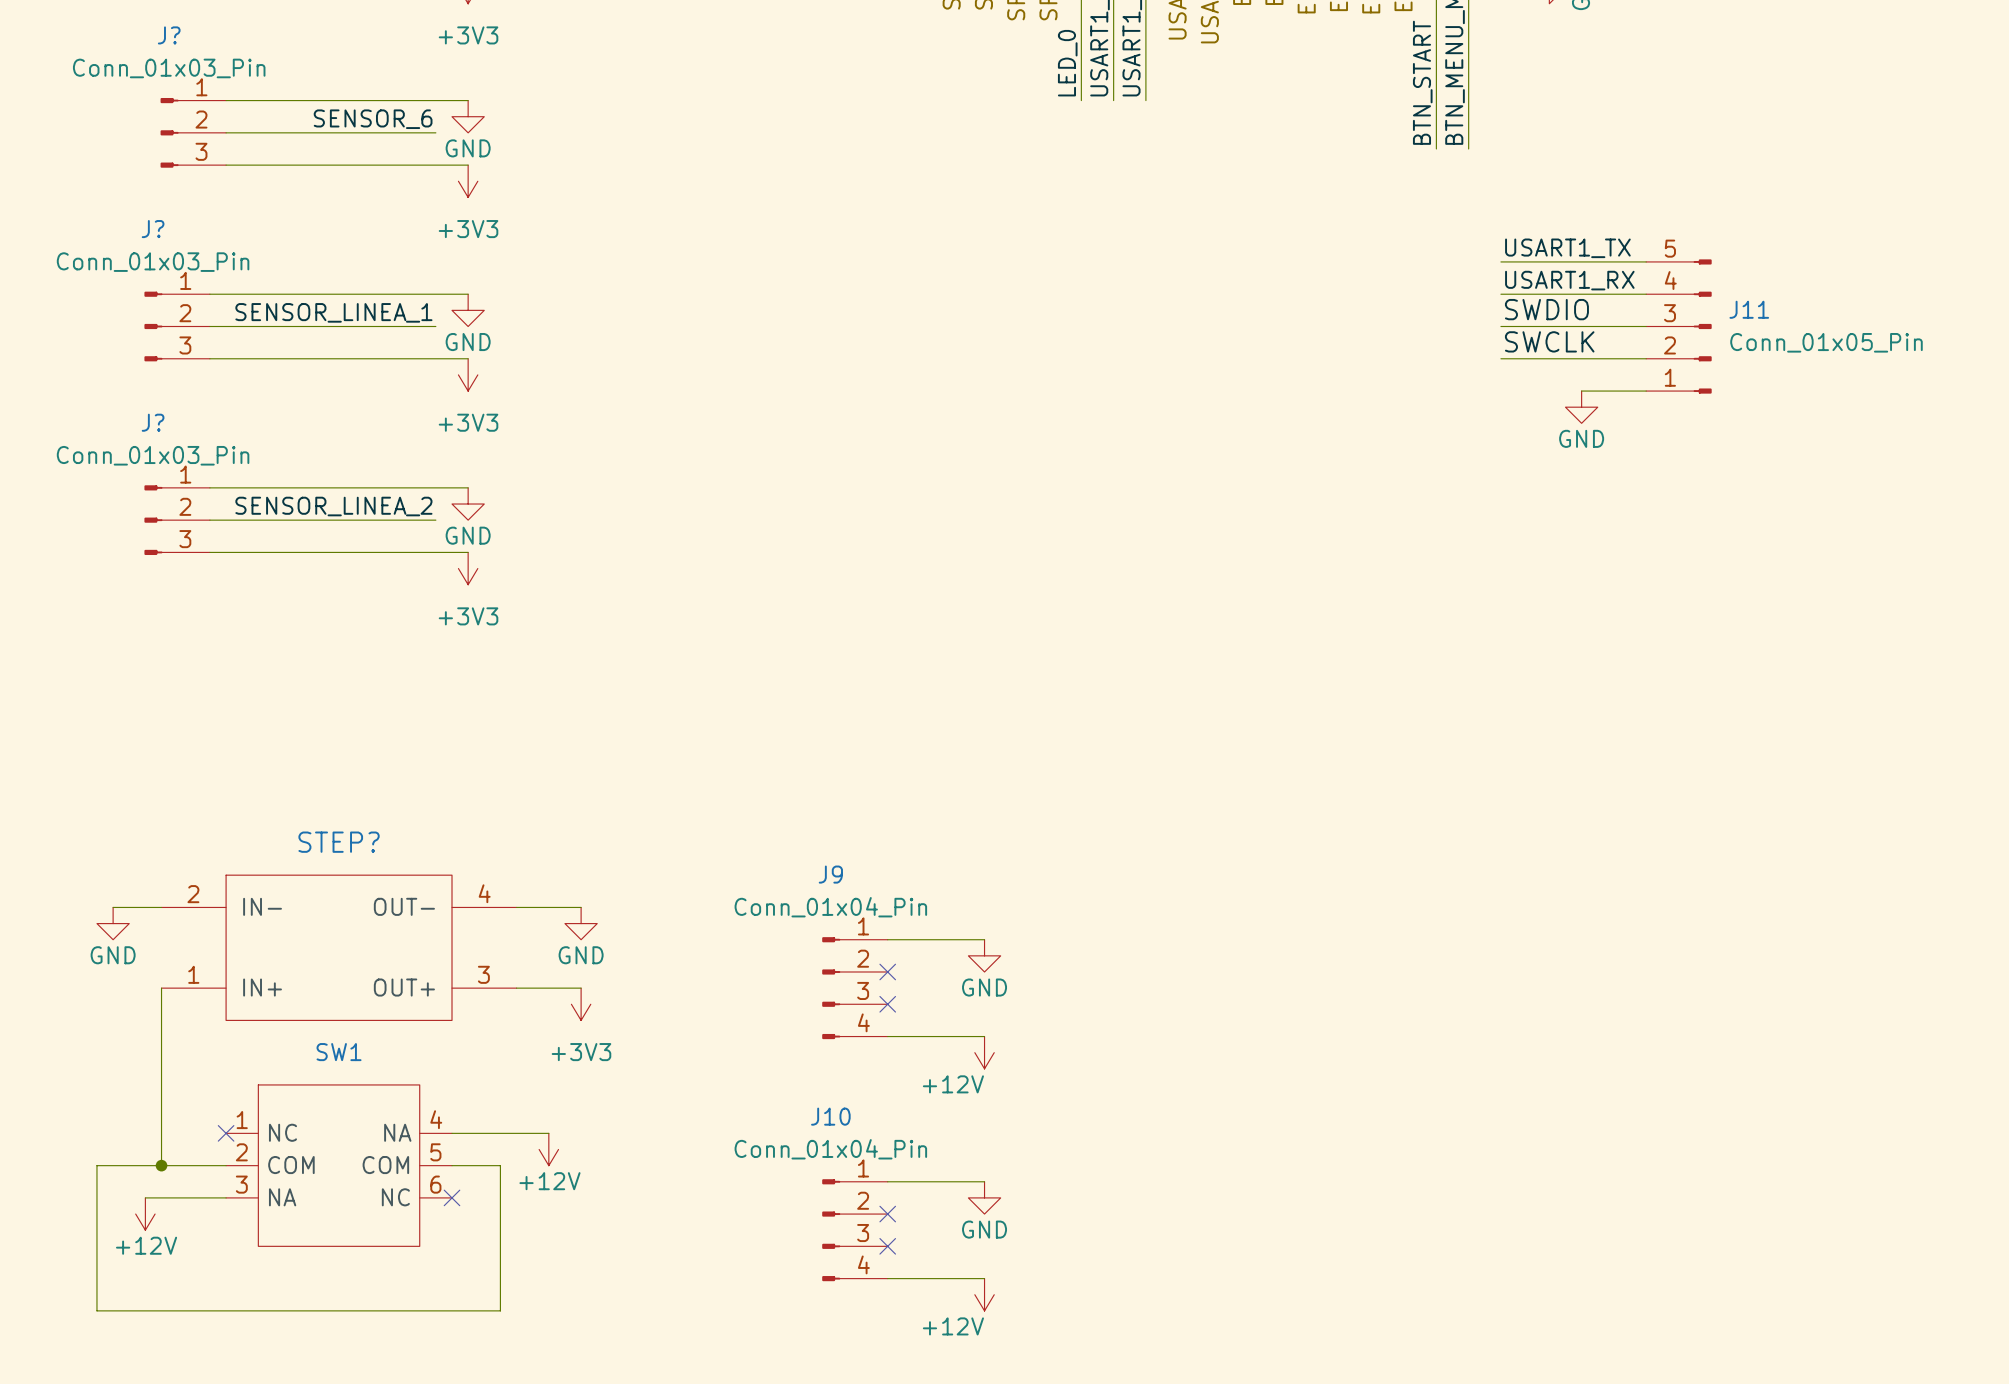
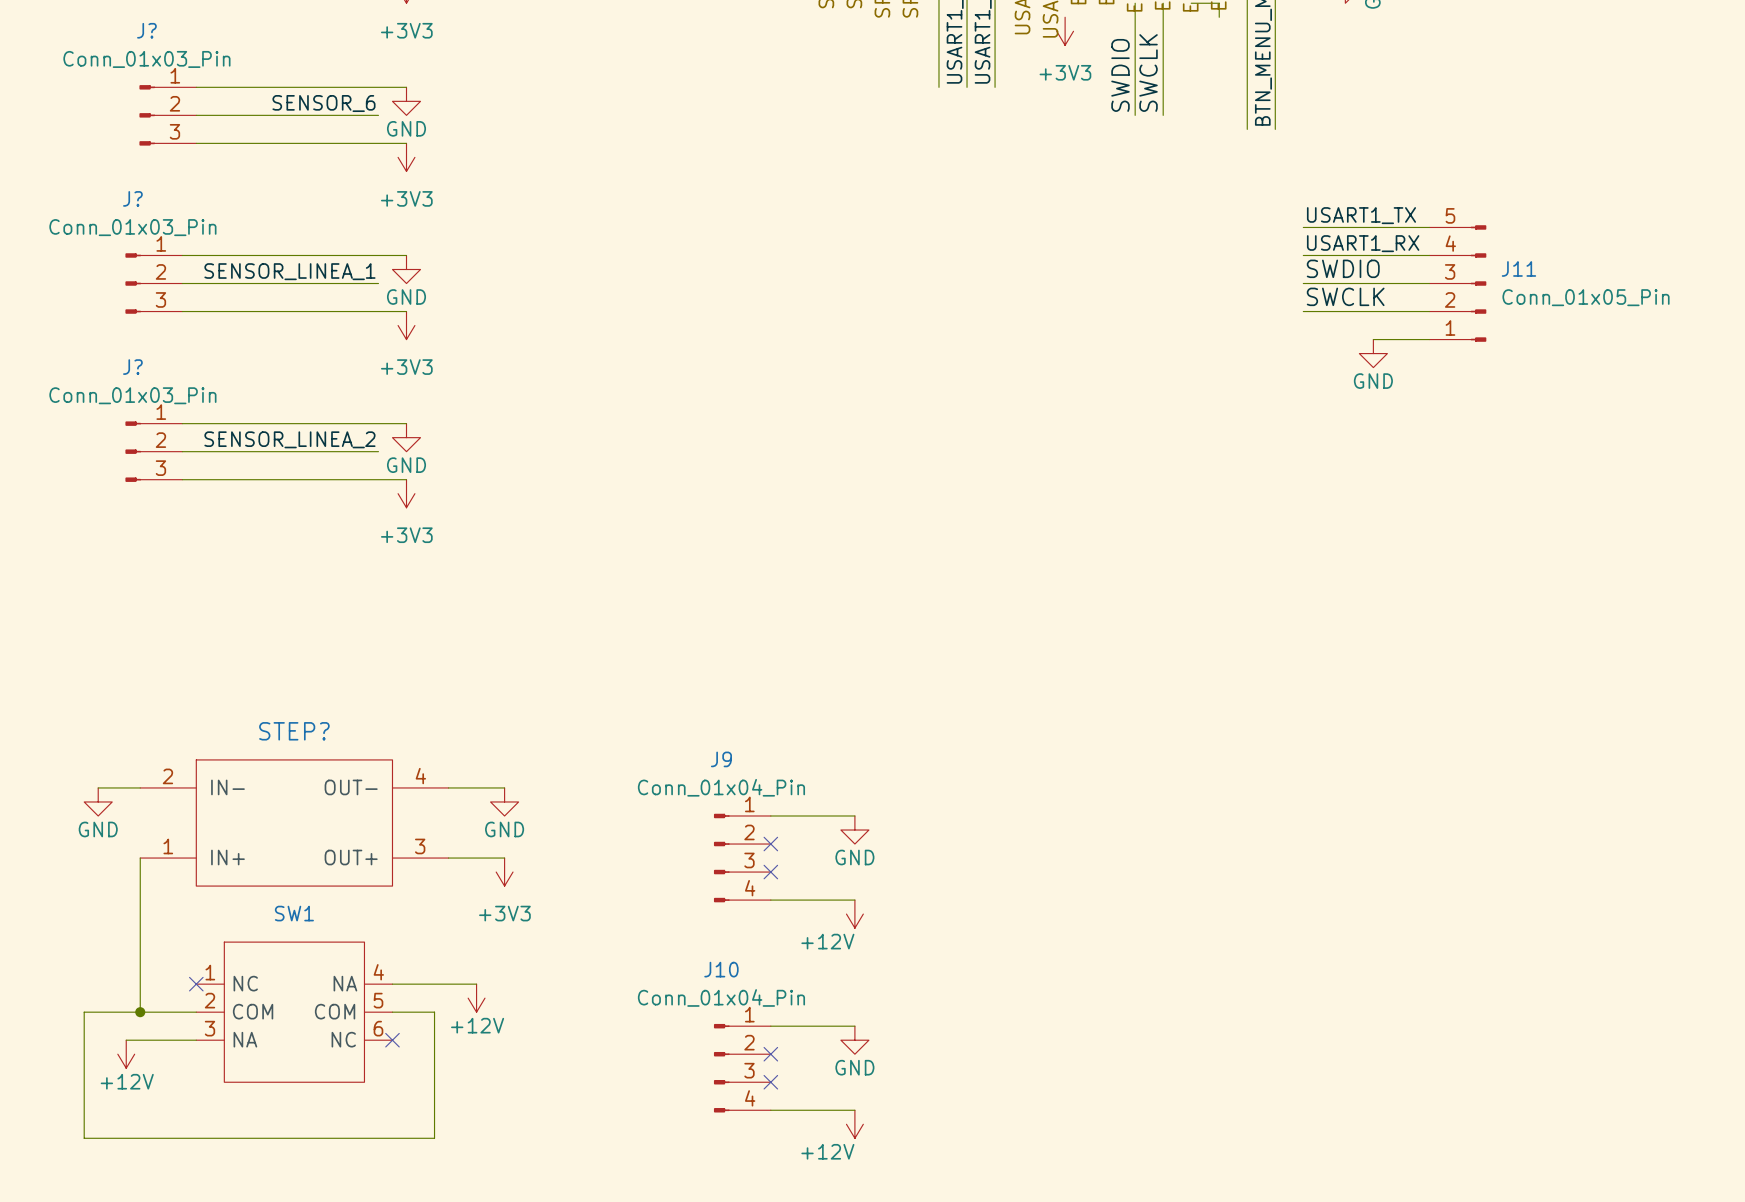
wire: none -> (1135, 3) (1135, 115)
wire: none -> (1163, 3) (1163, 115)
wire: none -> (1191, 3) (1219, 3) (1219, 17)
power symbol: none -> +3V3 (1065, 31)
label: LED_0 (1067, 63) -> none
label: BTN_START (1422, 82) -> none
label: none -> SWCLK (1148, 73)
label: none -> SWDIO (1120, 75)

